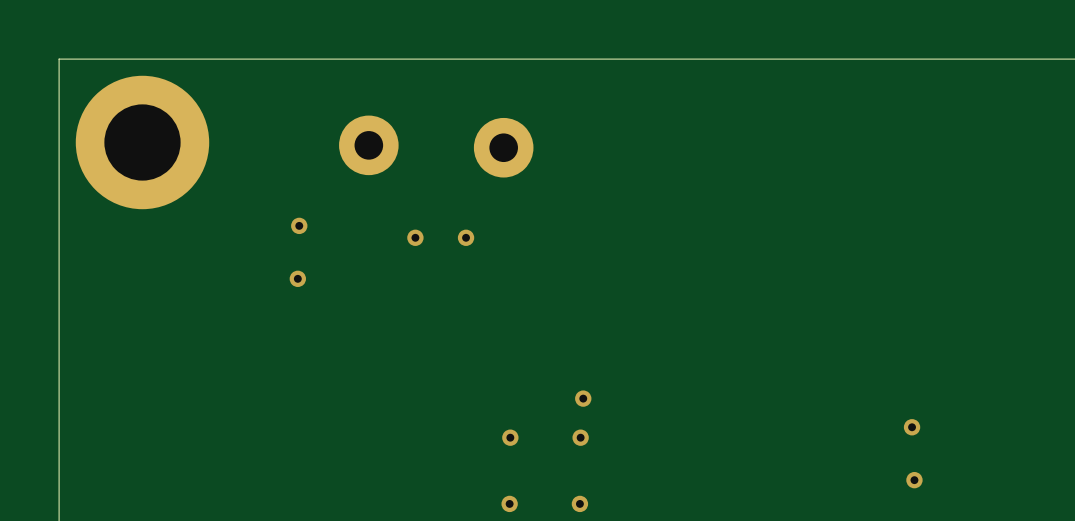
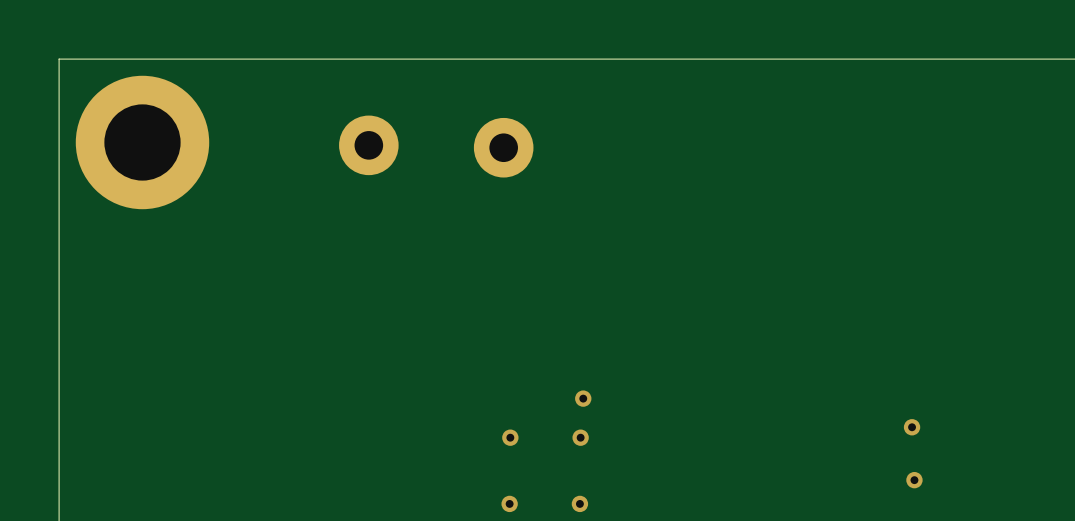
via: (299, 225) -> none
via: (415, 237) -> none
via: (466, 237) -> none
via: (297, 278) -> none

